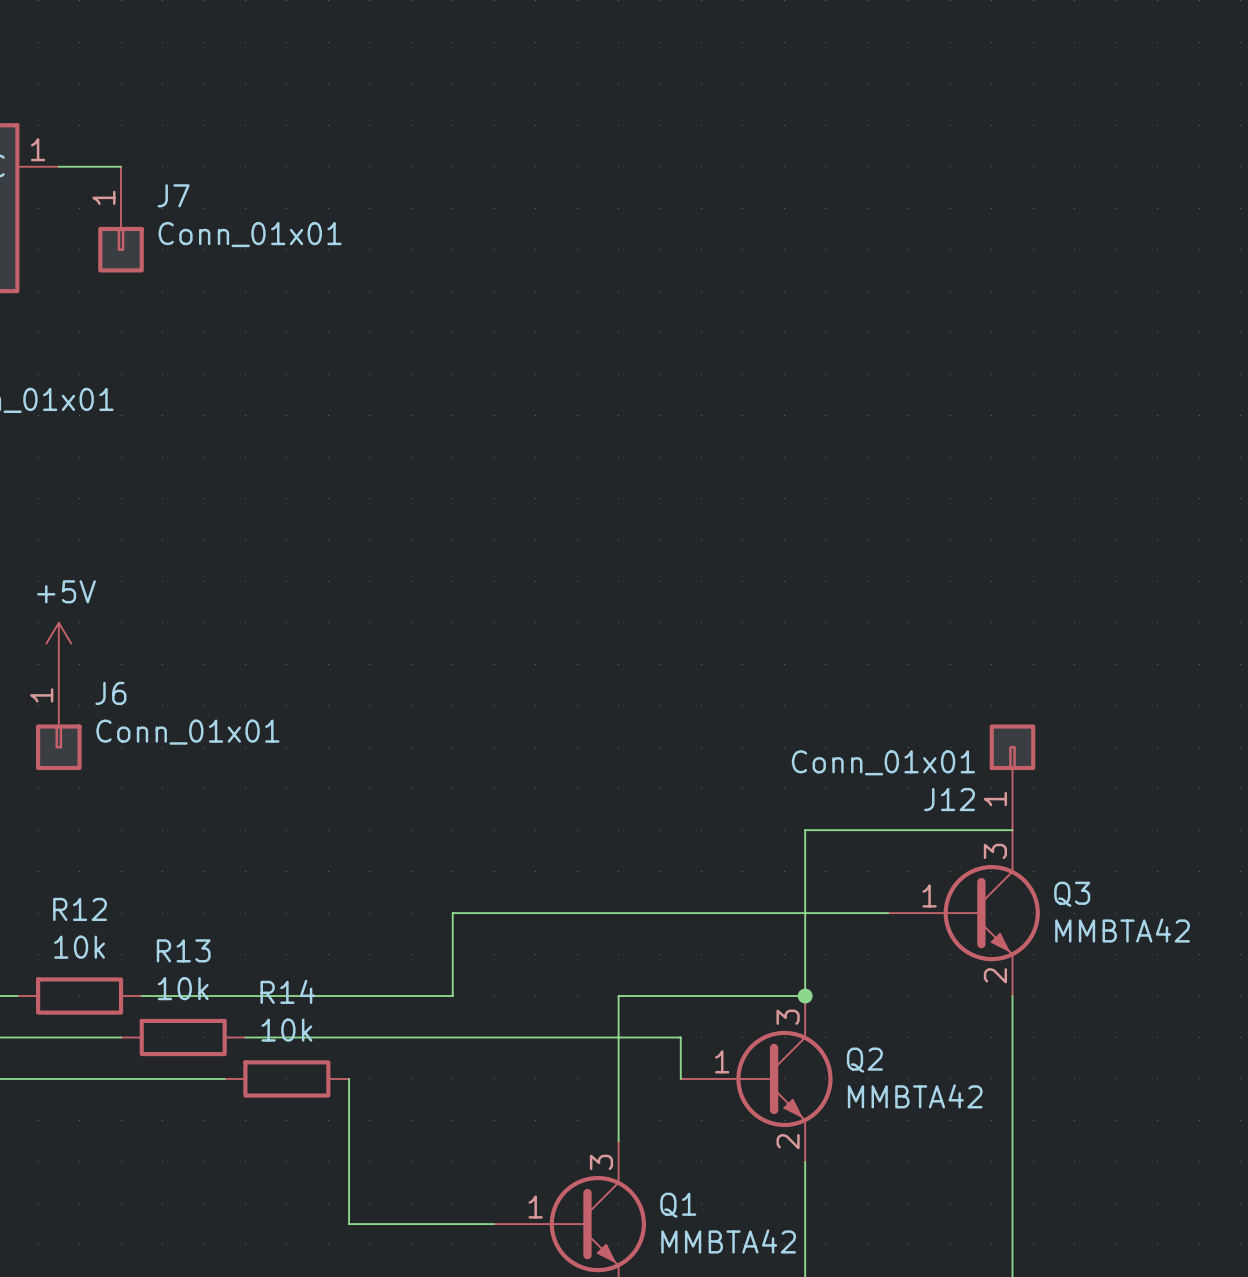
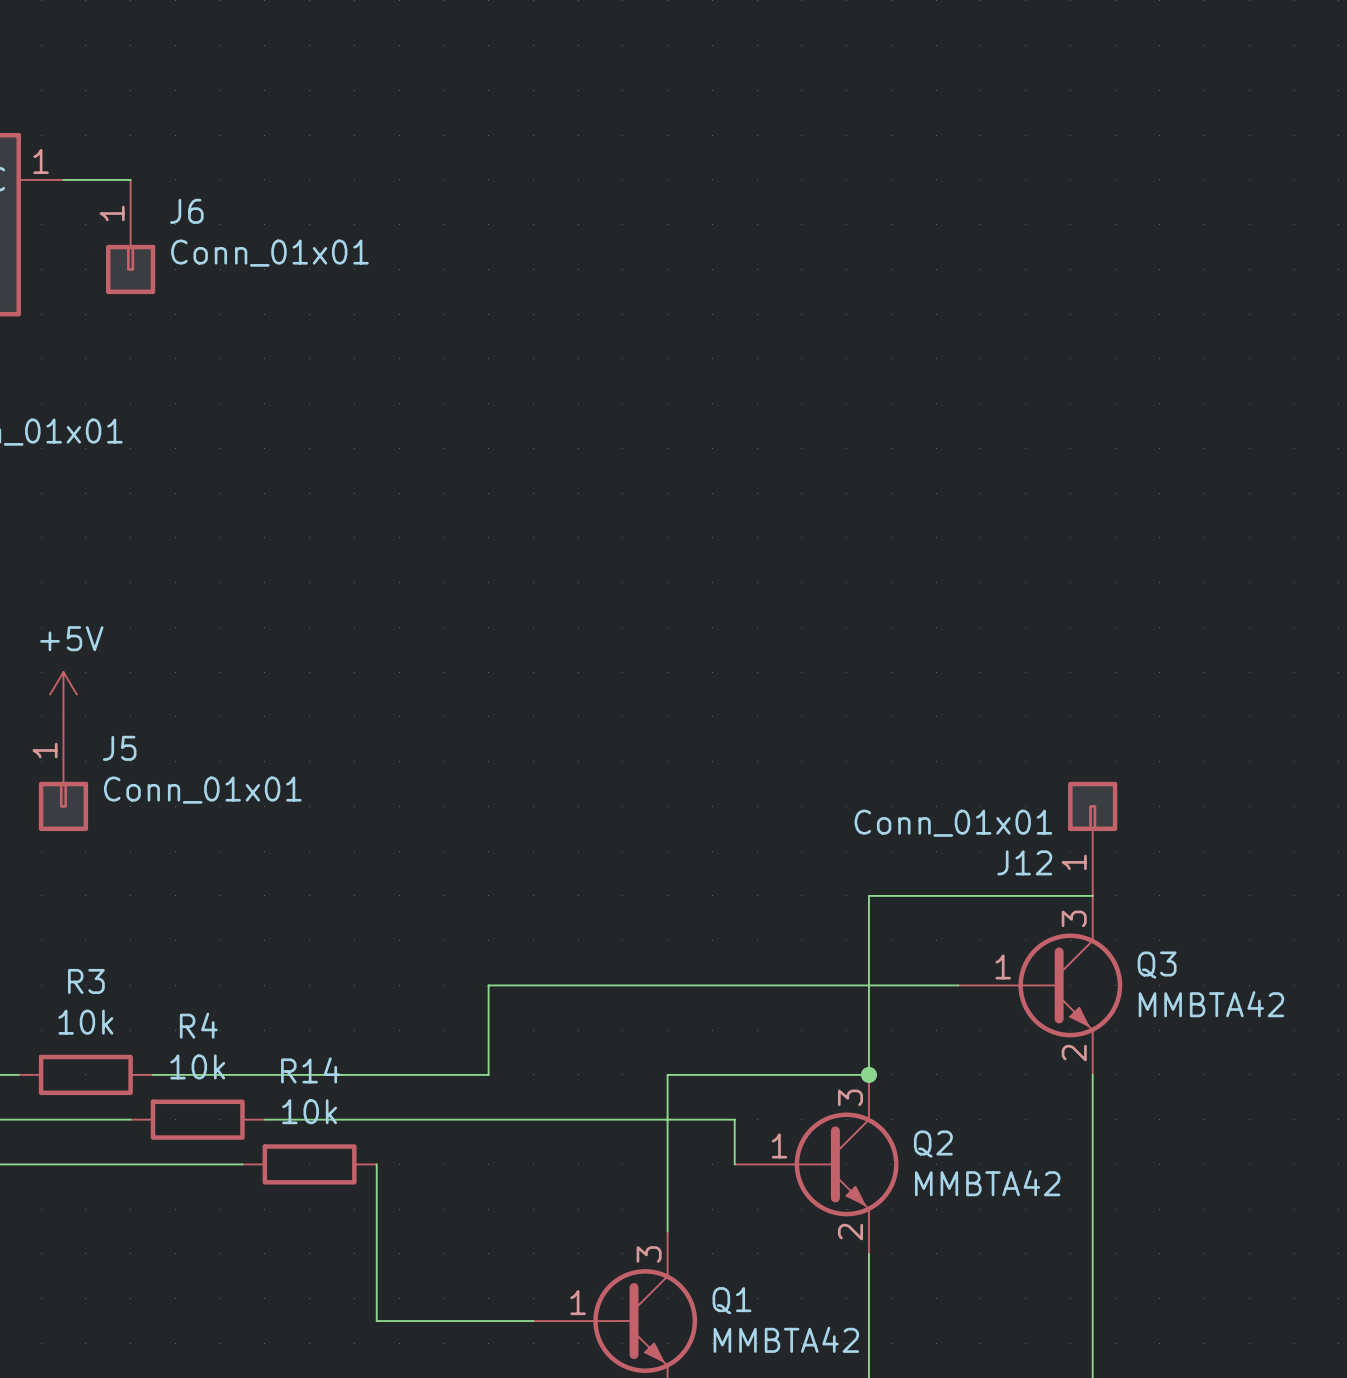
J7 name: J7 (173, 195) -> J6 (186, 211)
J6 name: J6 (110, 693) -> J5 (119, 748)
R12 name: R12 (80, 909) -> R3 (86, 981)
R13 name: R13 (183, 950) -> R4 (198, 1025)

